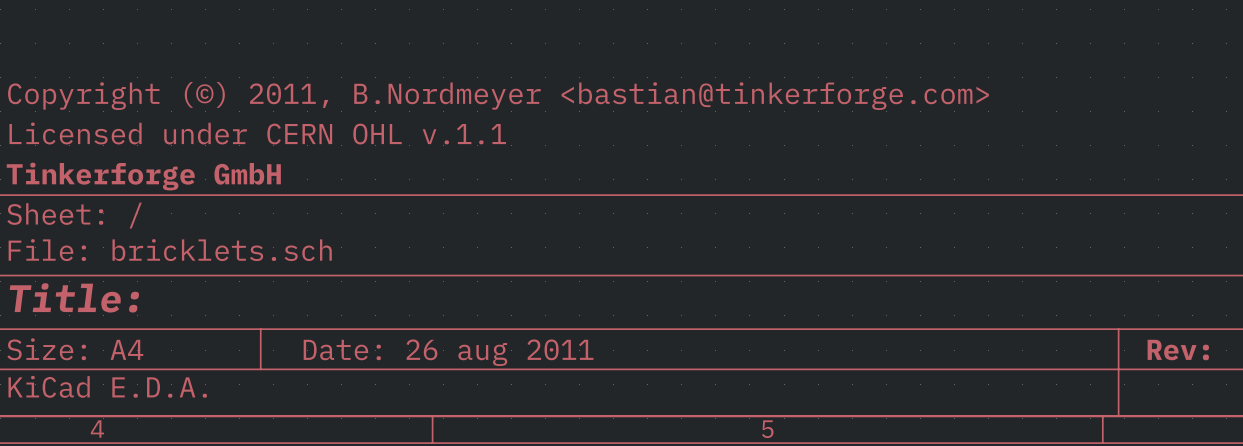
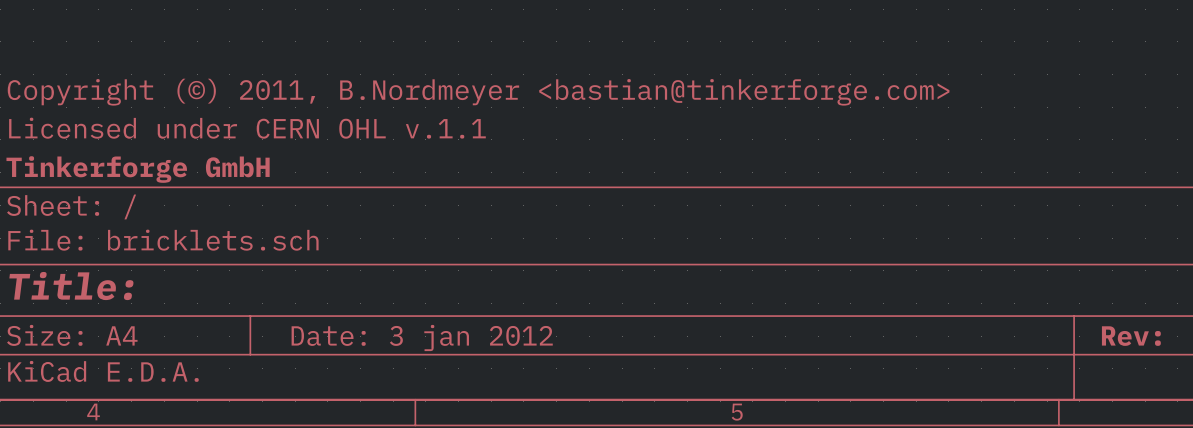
title block: Date: 26 aug 2011 (448, 352) -> Date: 3 jan 2012 (422, 338)

